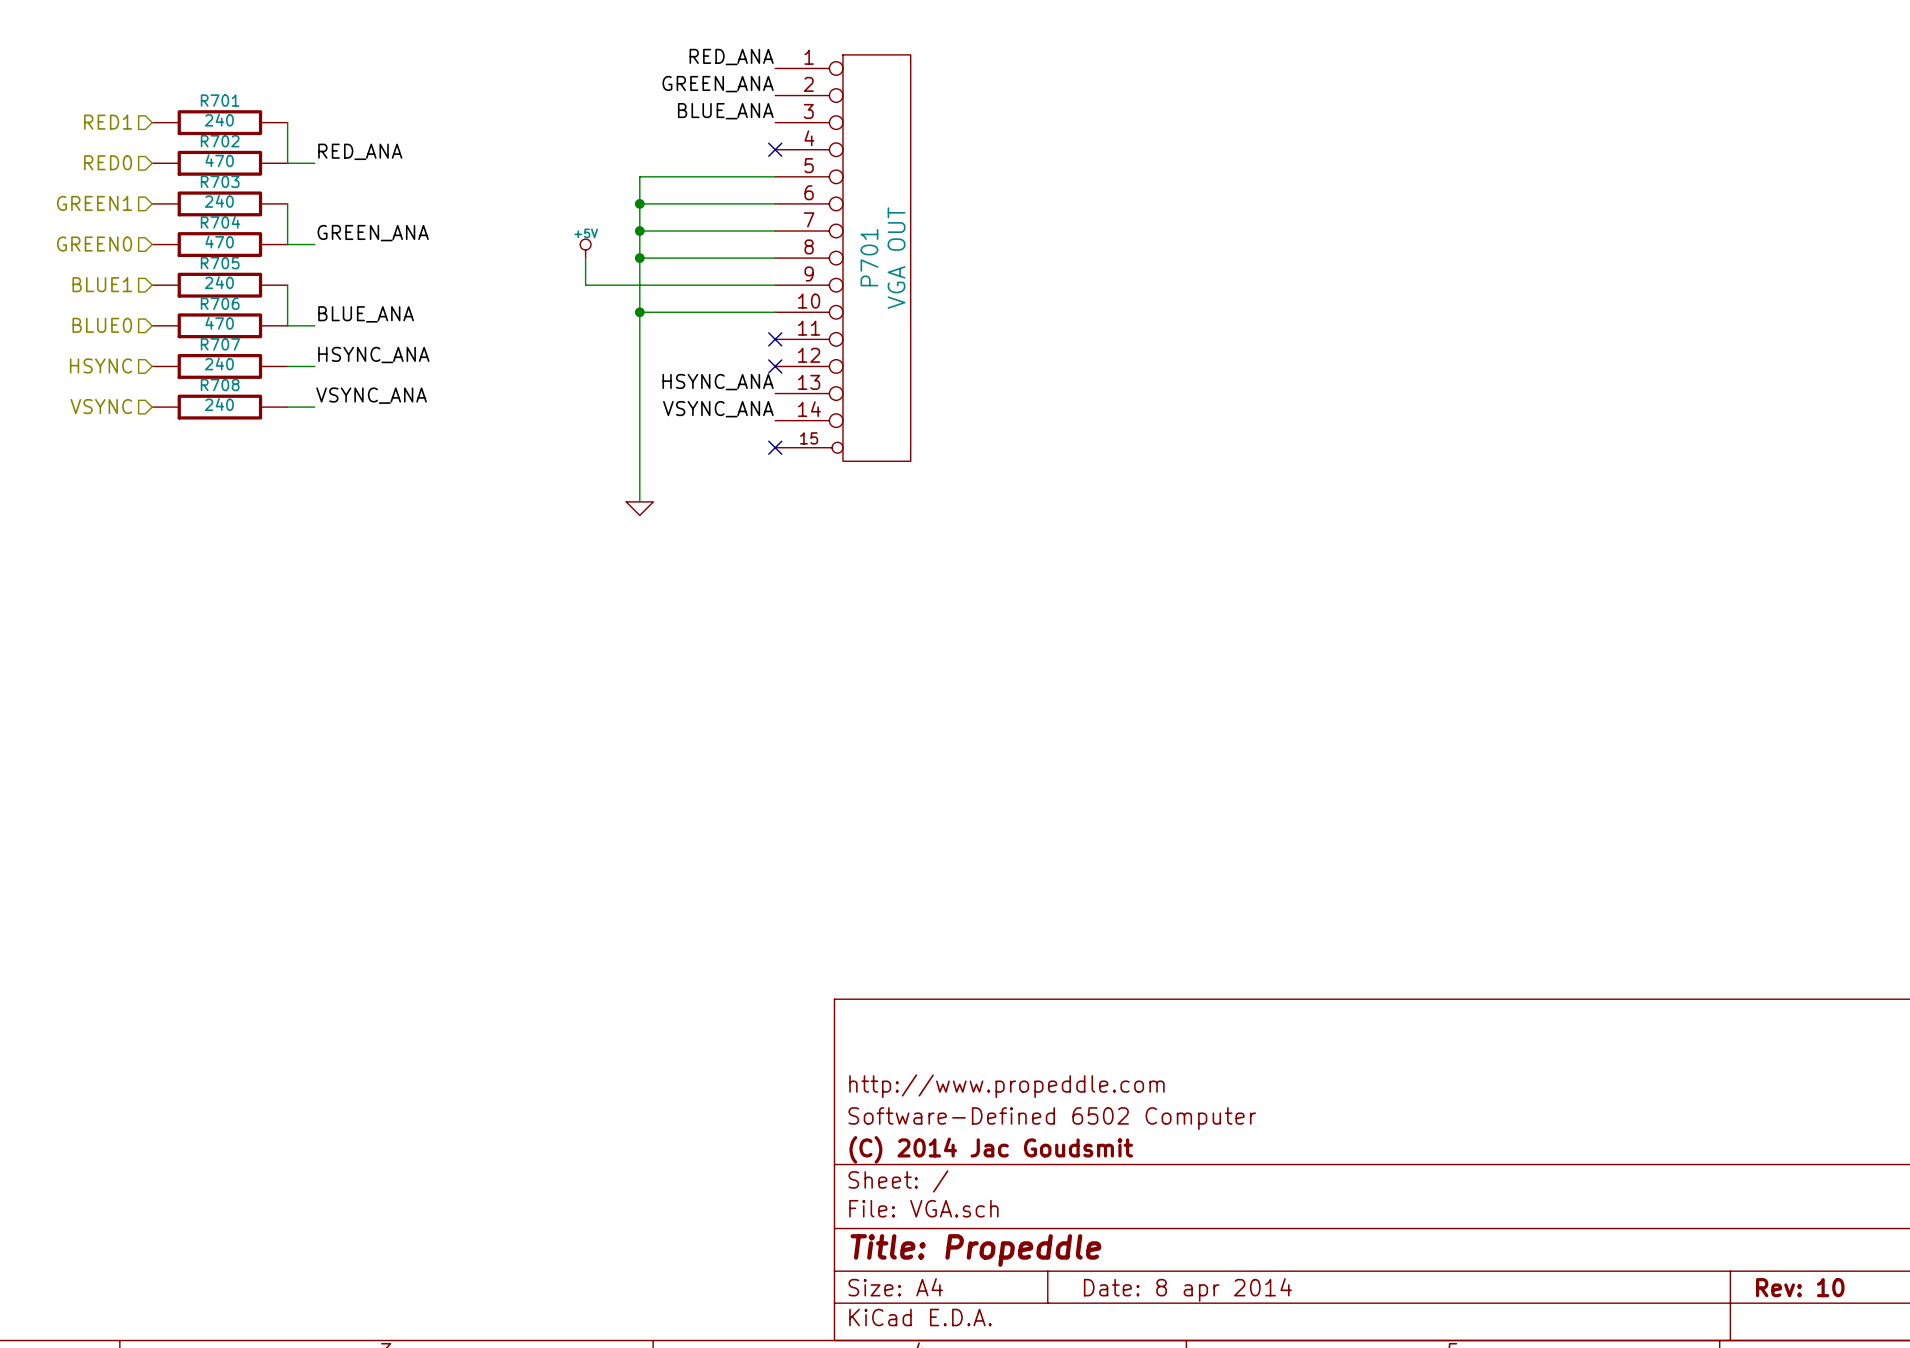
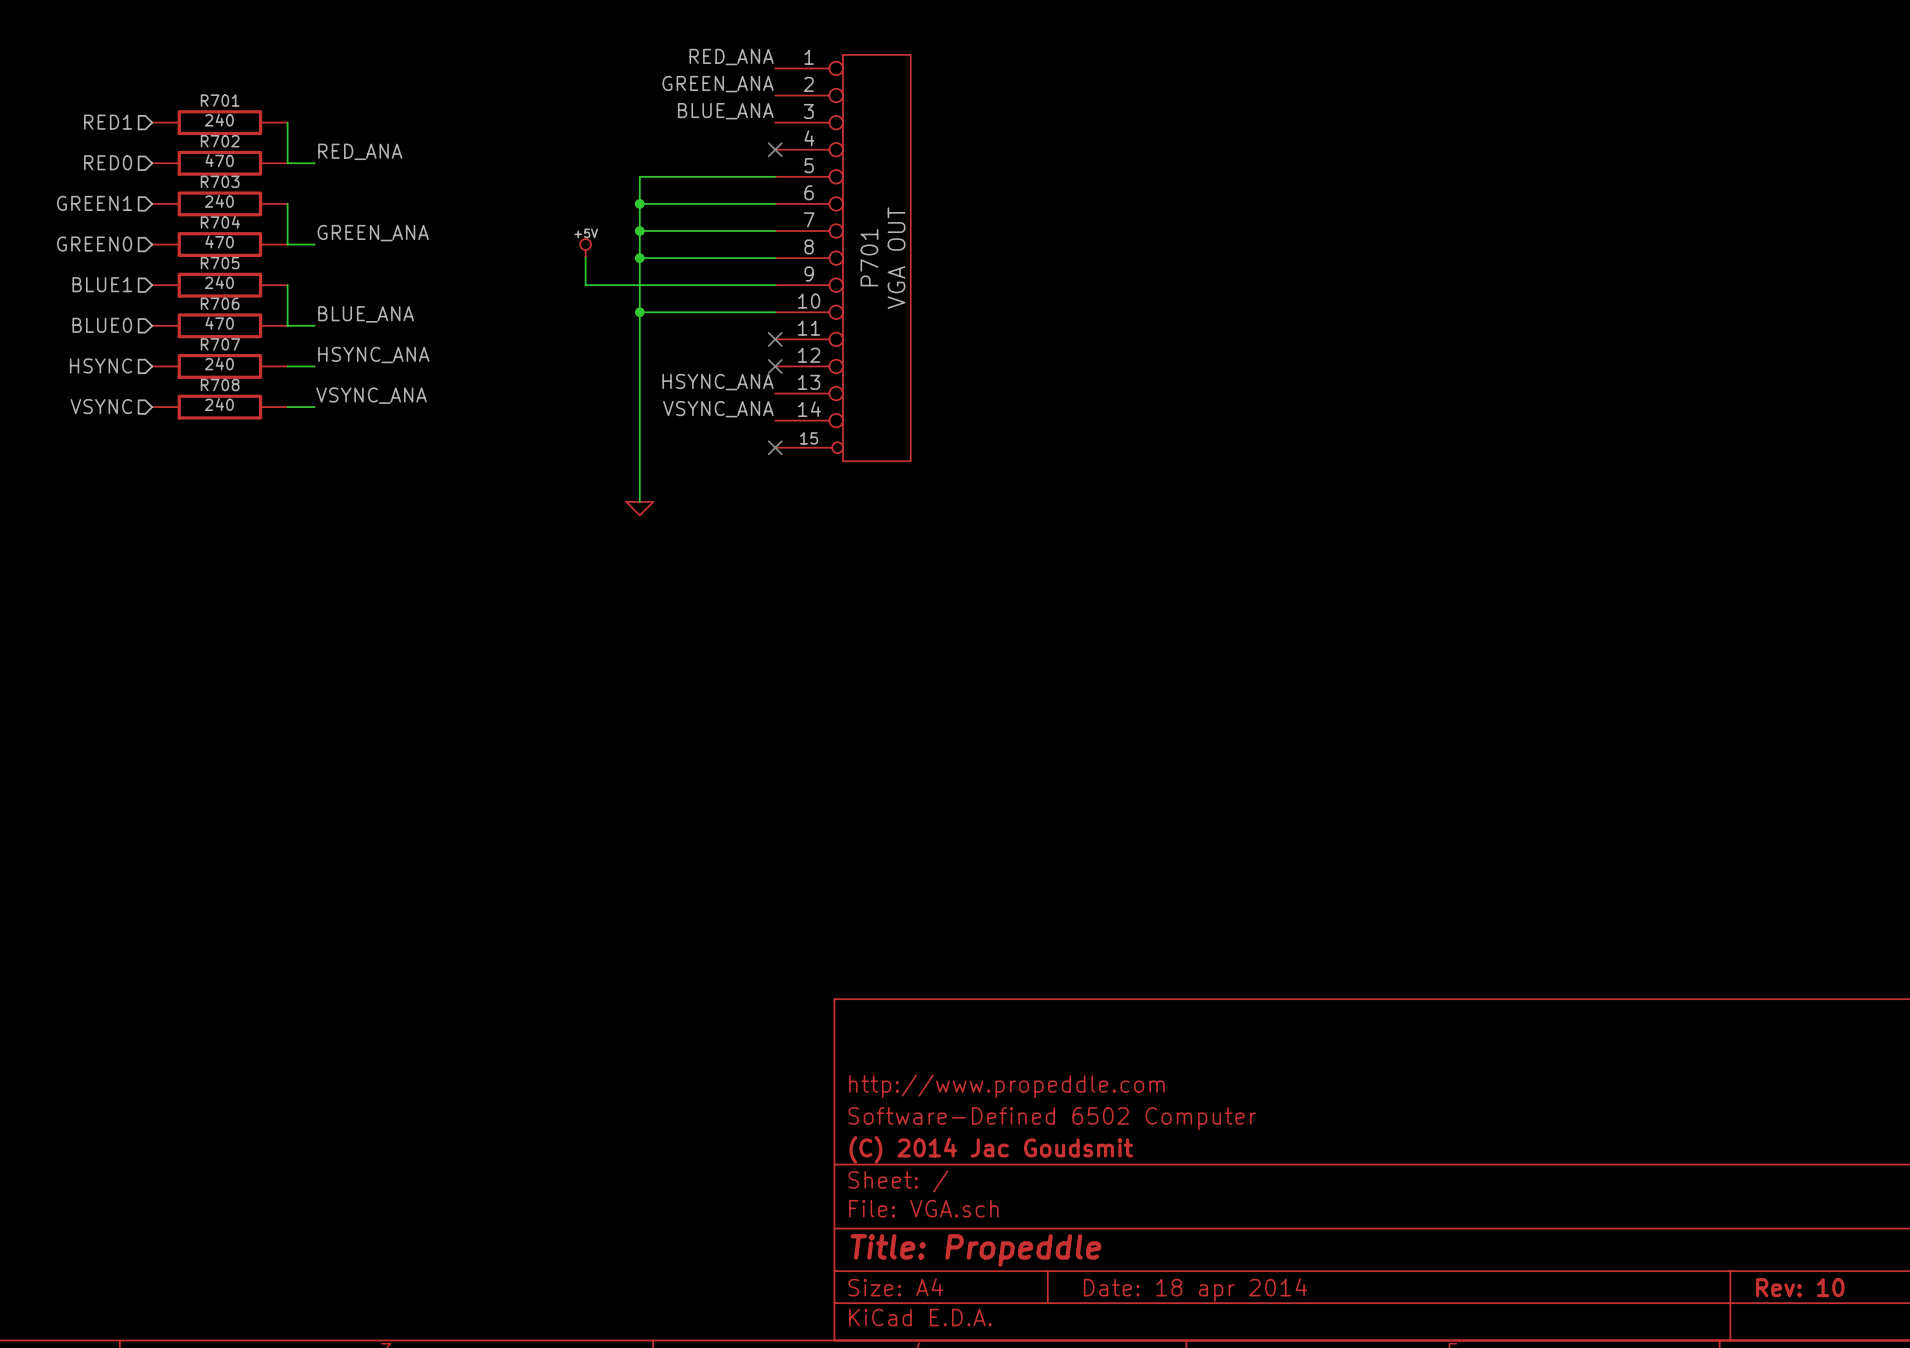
title block: Date: 8 apr 2014 (1187, 1289) -> Date: 18 apr 2014 (1195, 1289)

